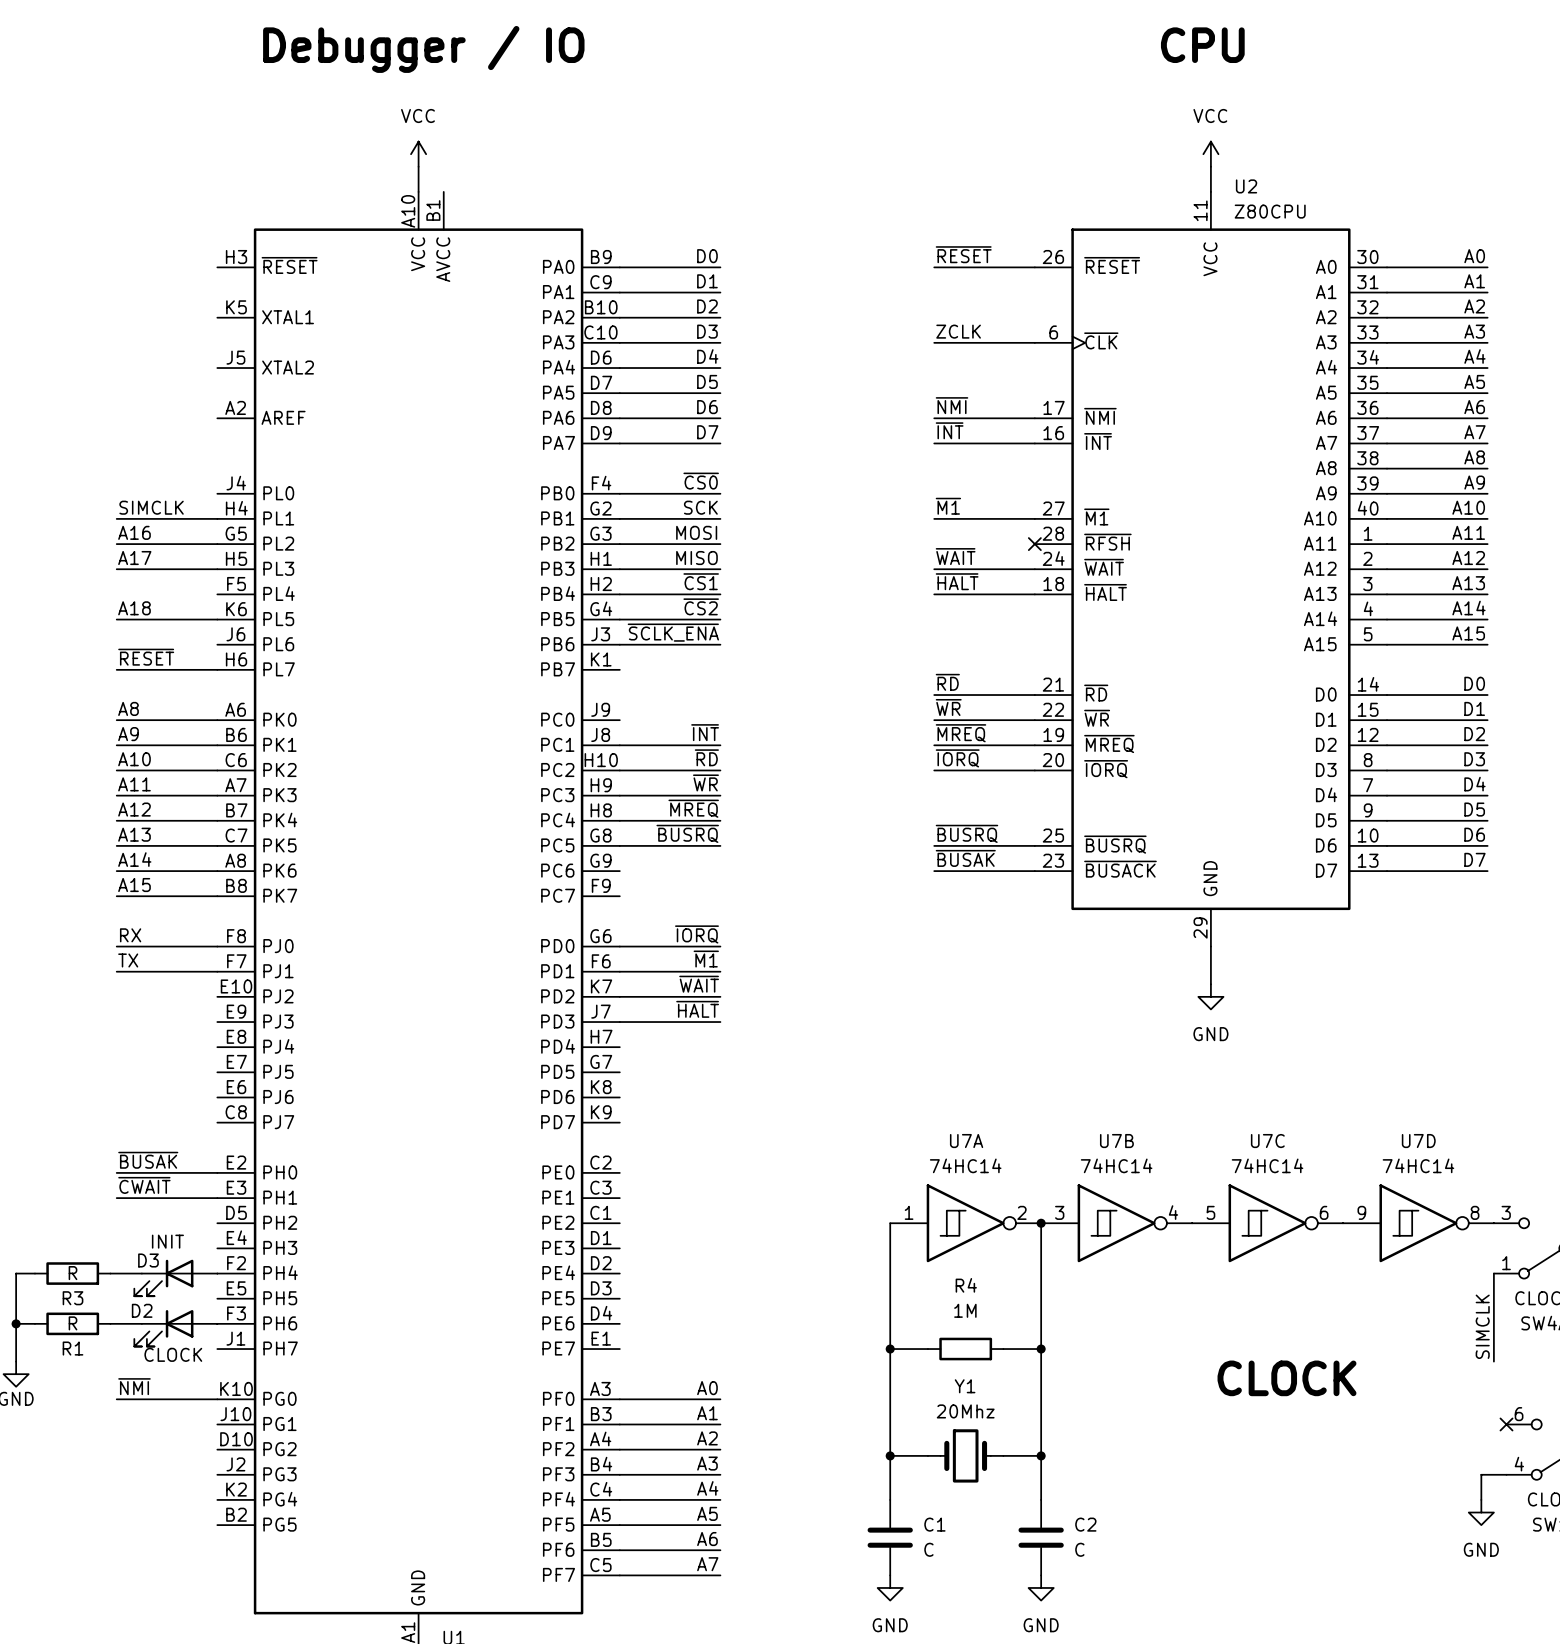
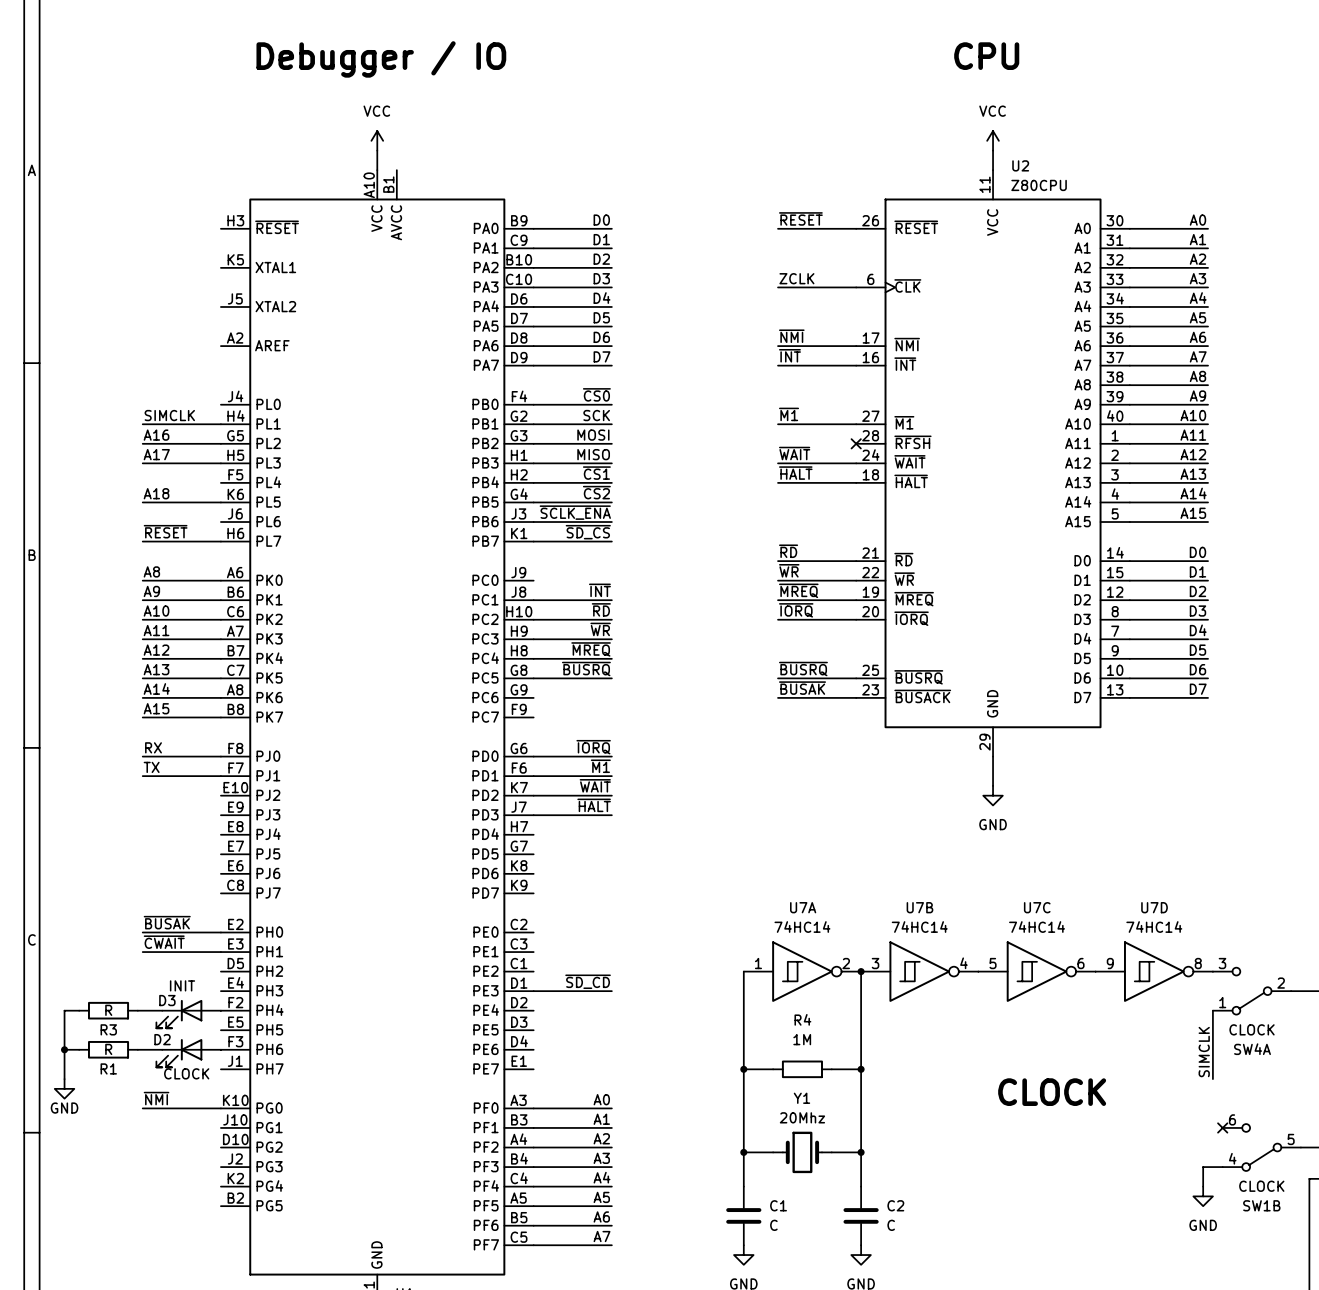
label: none -> ~{SD_CS} (588, 532)
wire: none -> (533, 541) (611, 541)
label: none -> ~{SD_CD} (588, 981)
wire: none -> (533, 991) (611, 991)

